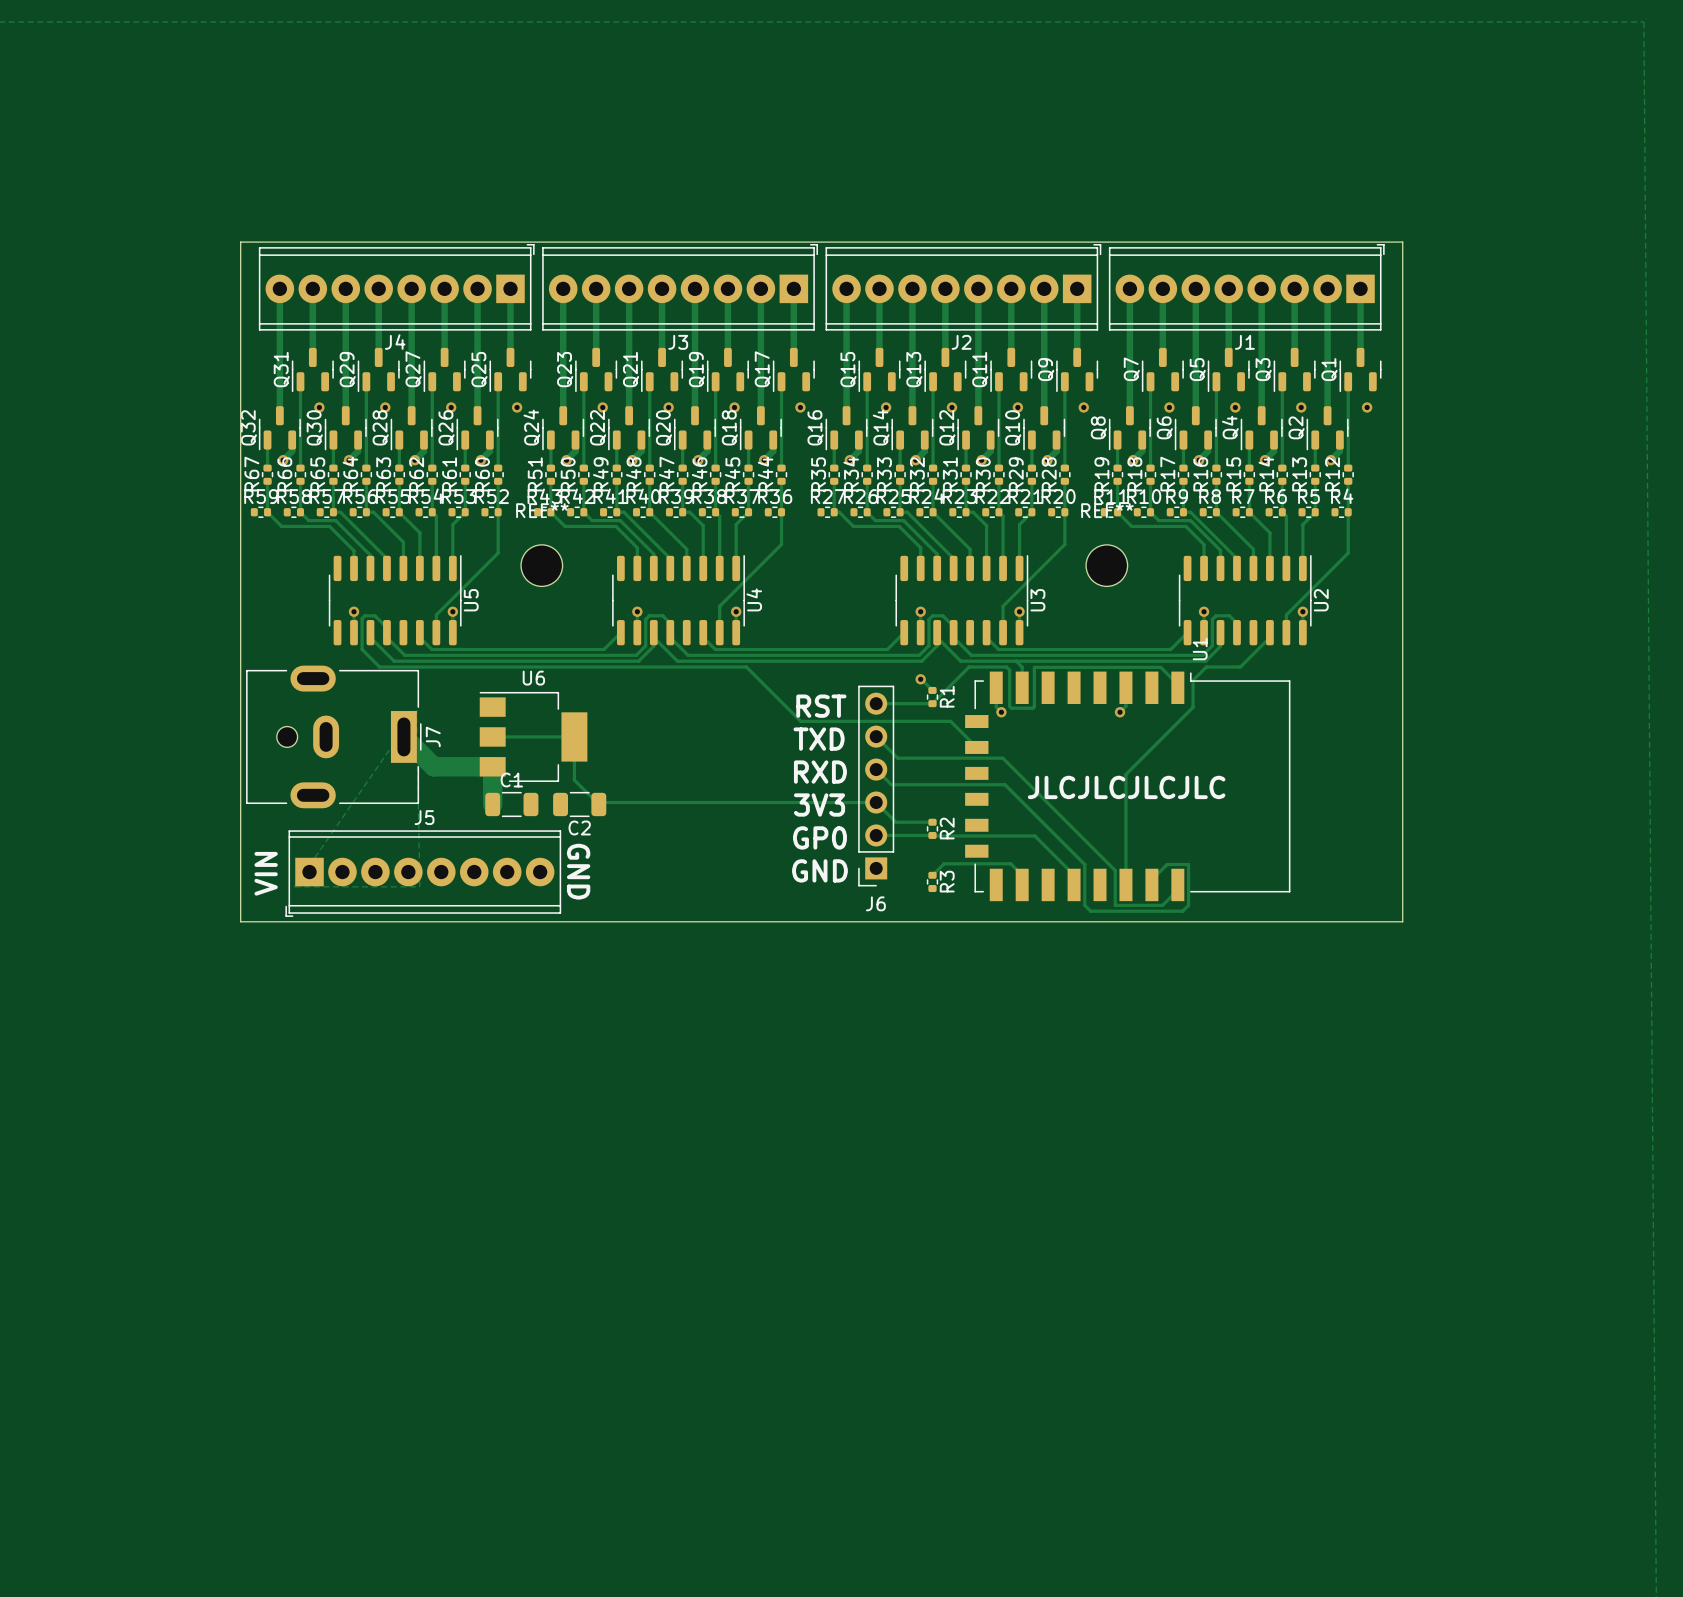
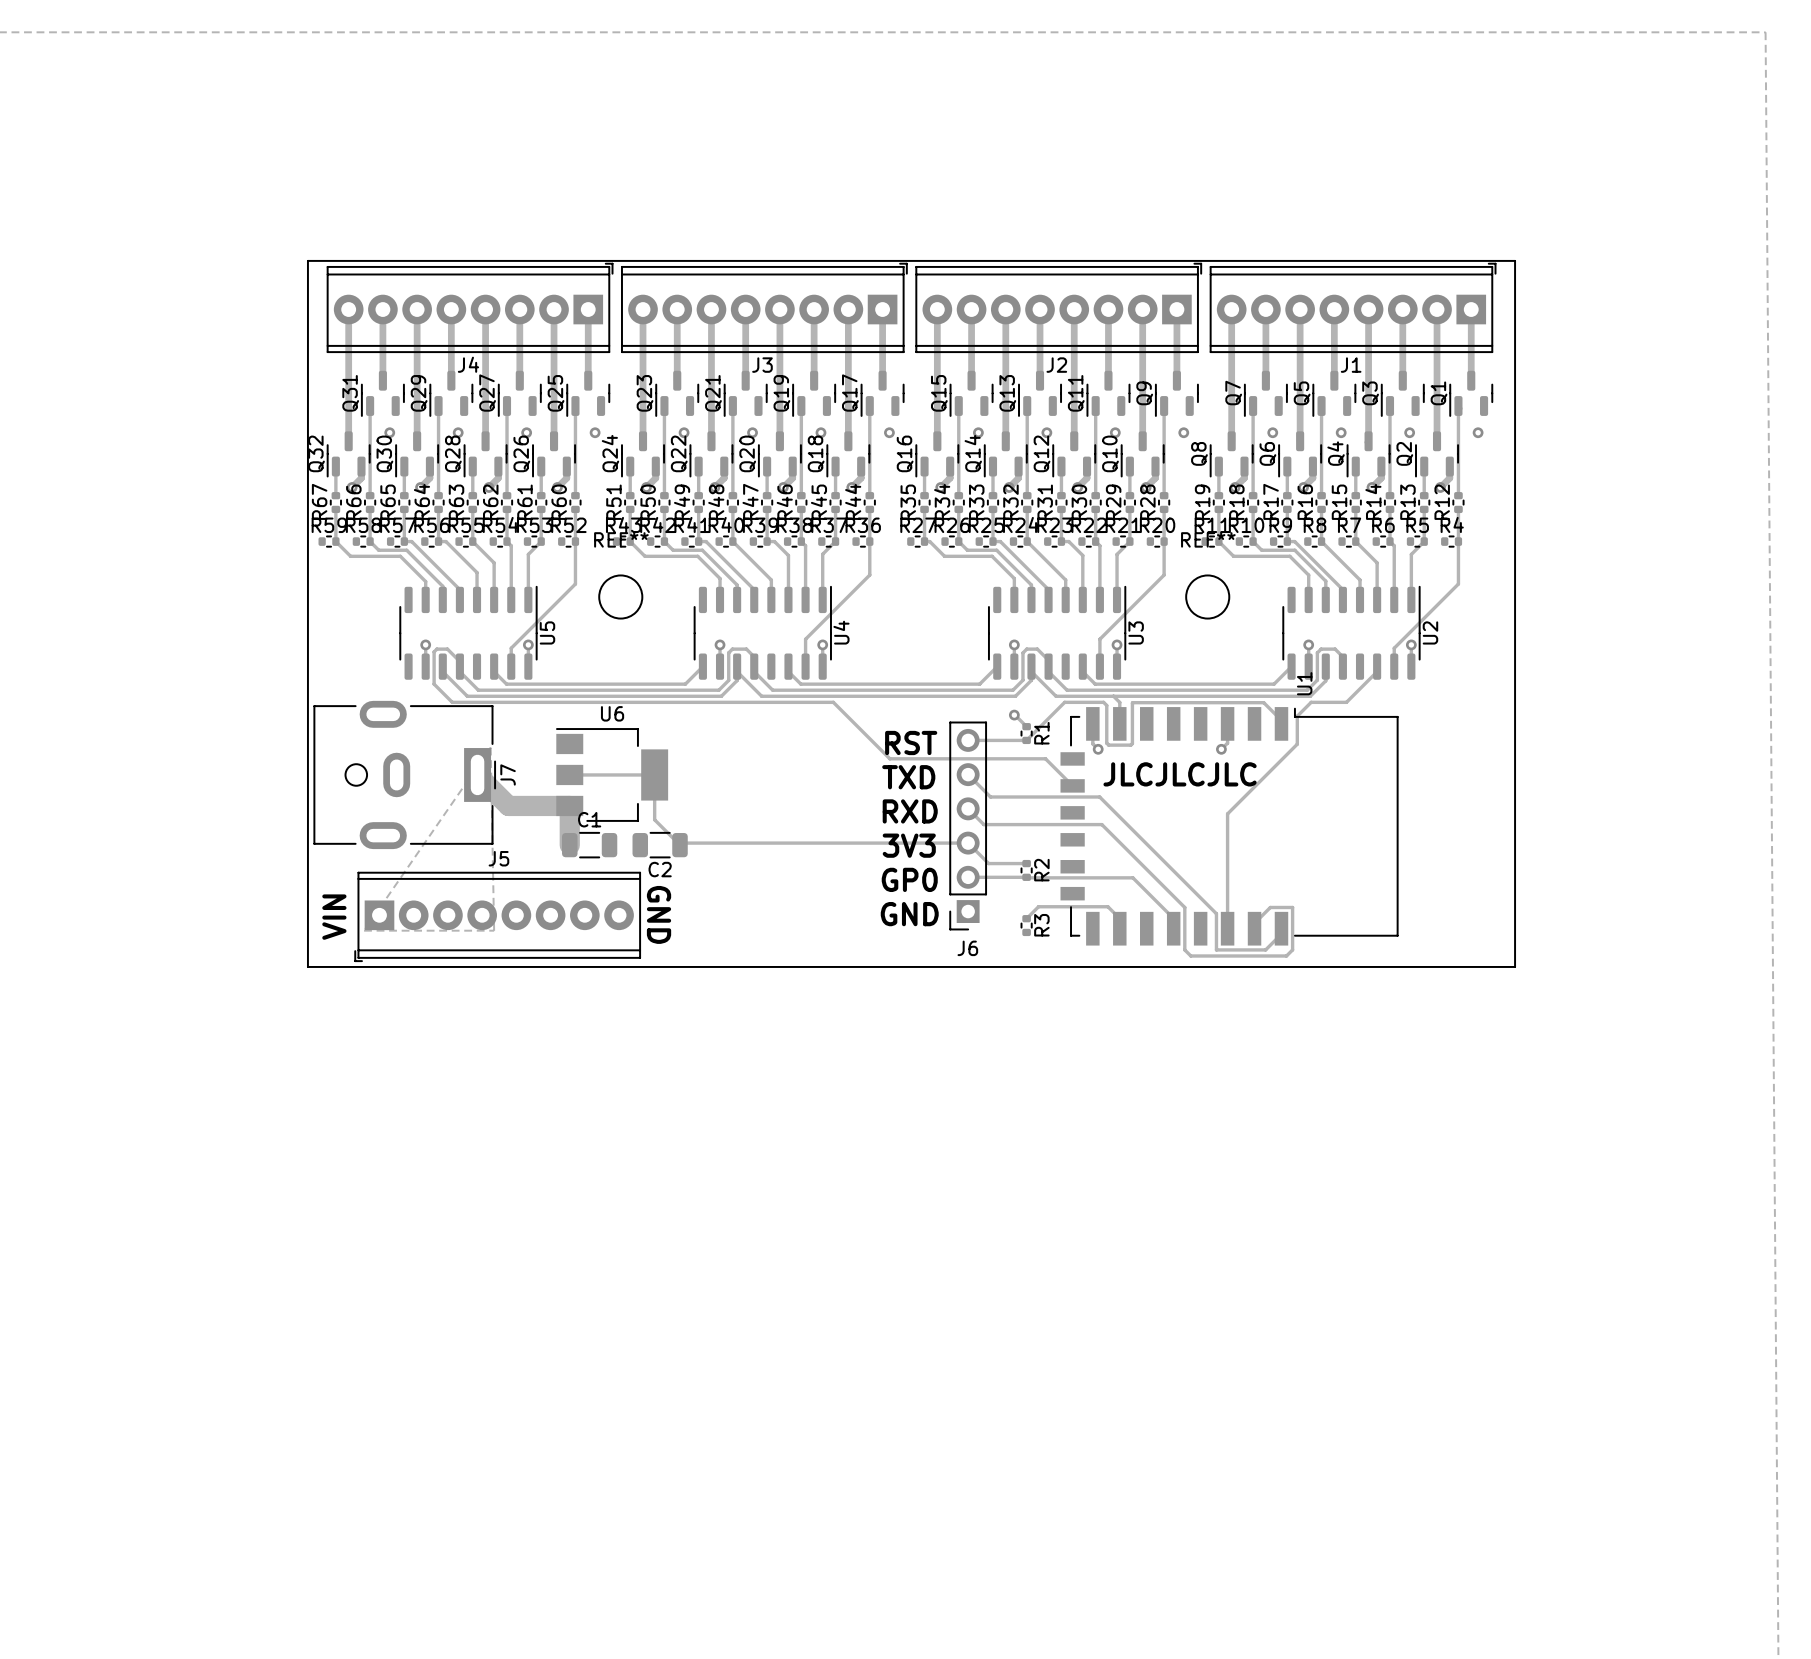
text: none -> JLCJLCJLC (1180, 774)
text: JLCJLCJLCJLC (1126, 787) -> none

